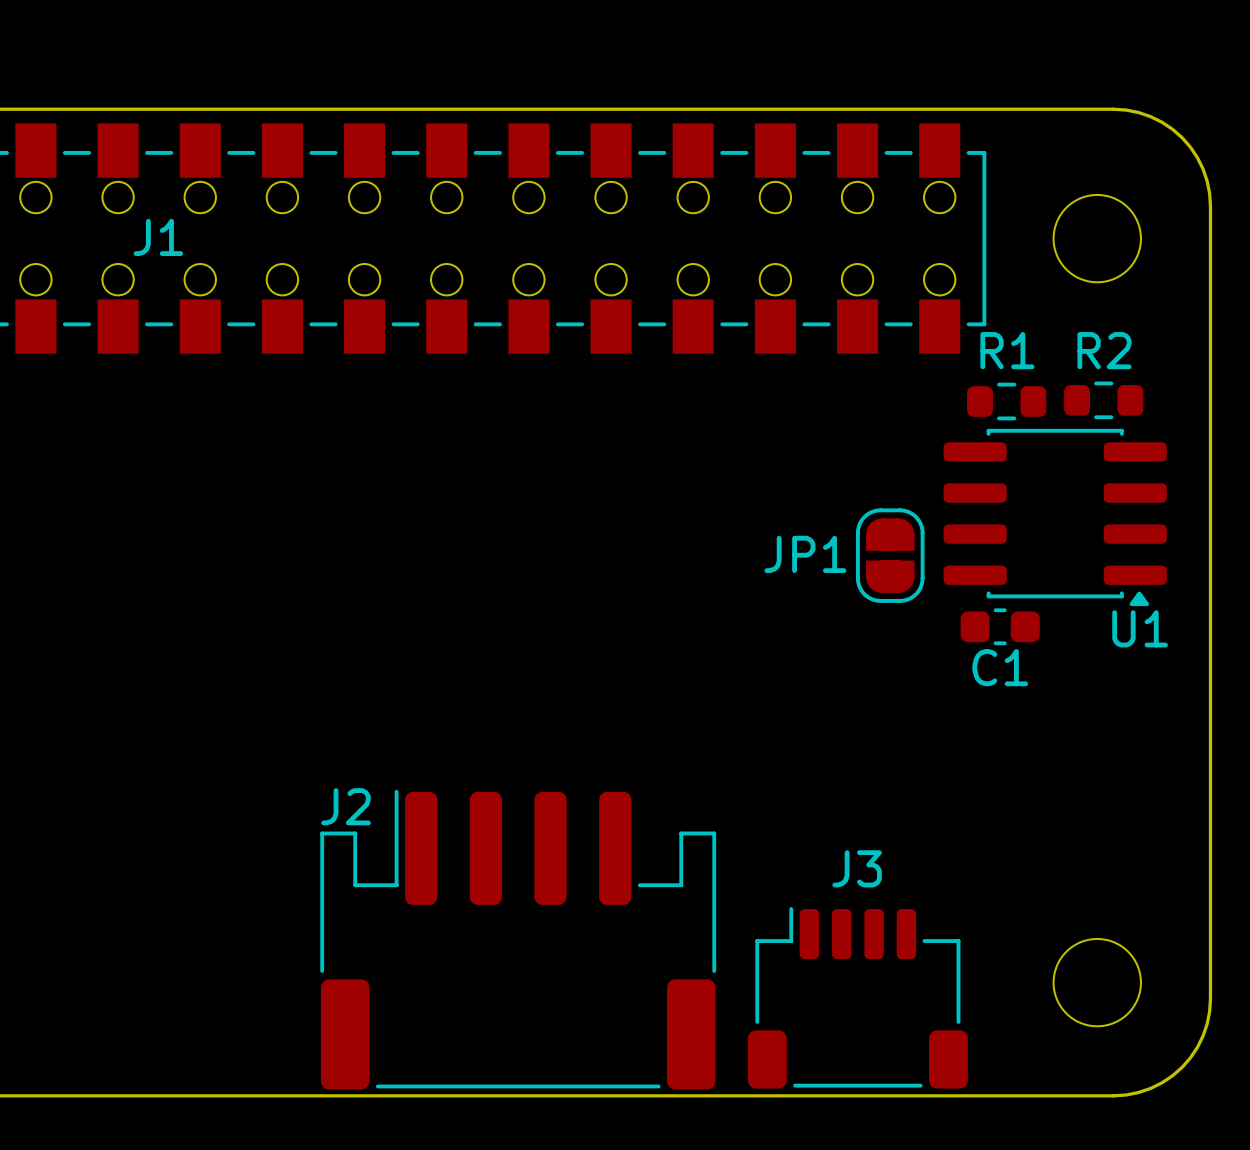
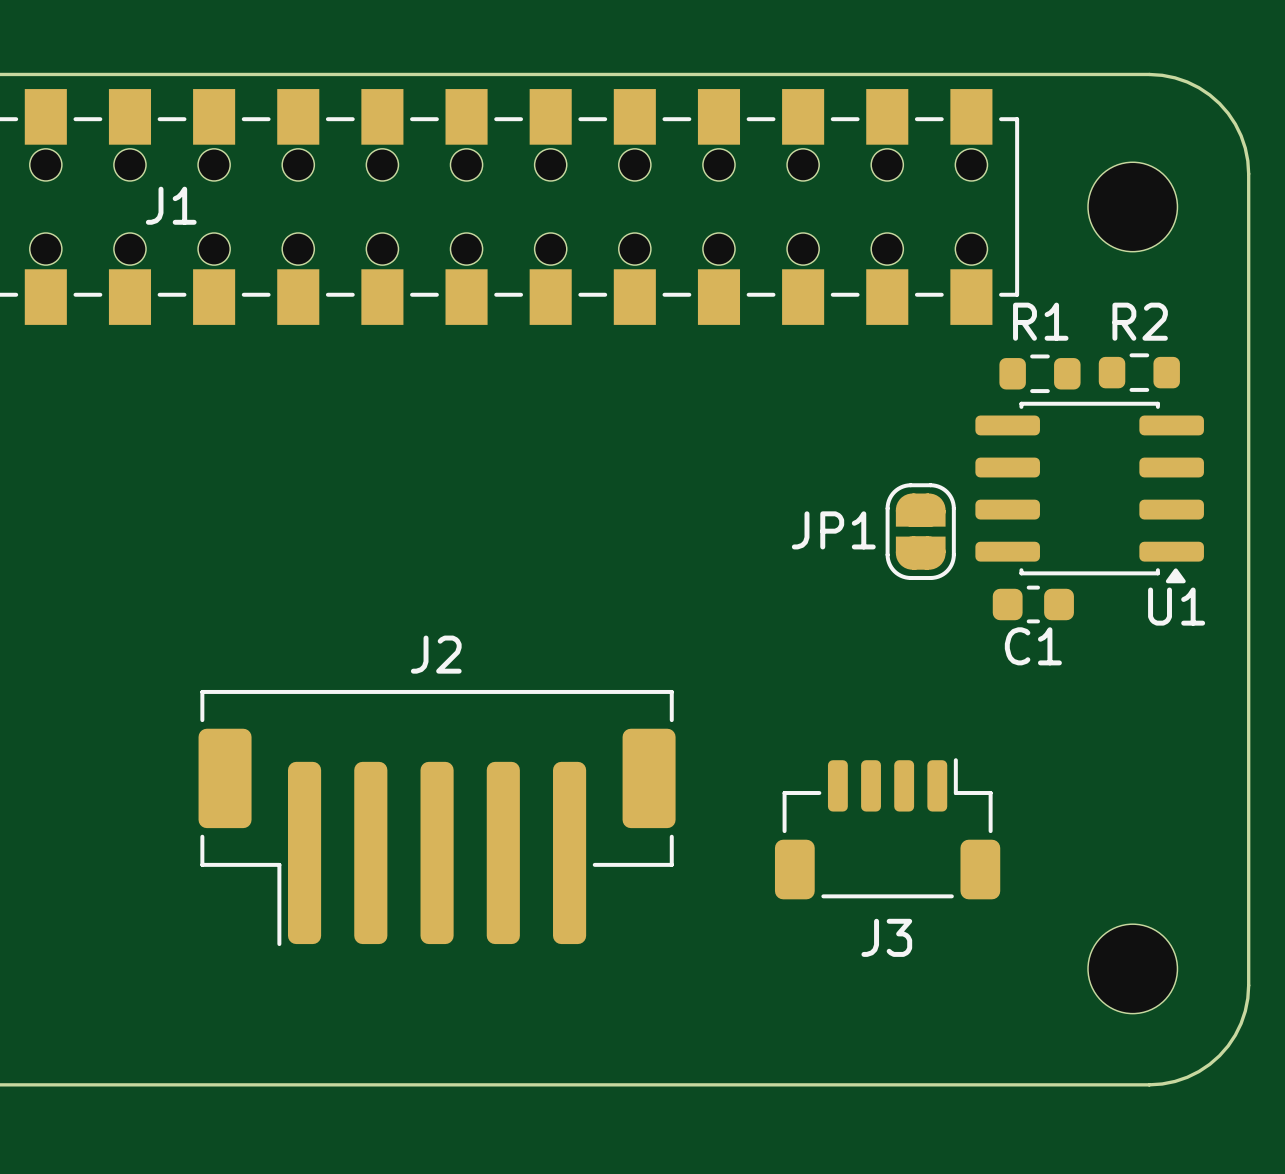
J2 footprint: [320, 789, 717, 1090] -> [198, 689, 676, 947]
J2 name position: J2 (346, 806) -> J2 (436, 654)
J3 name position: J3 (857, 868) -> J3 (886, 937)
J3 footprint: [747, 907, 968, 1089] -> [774, 758, 1001, 900]

